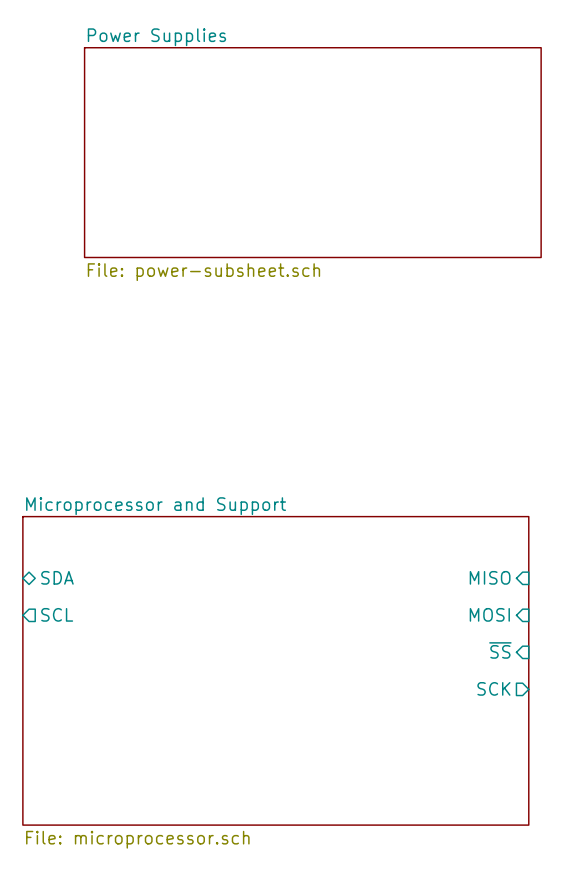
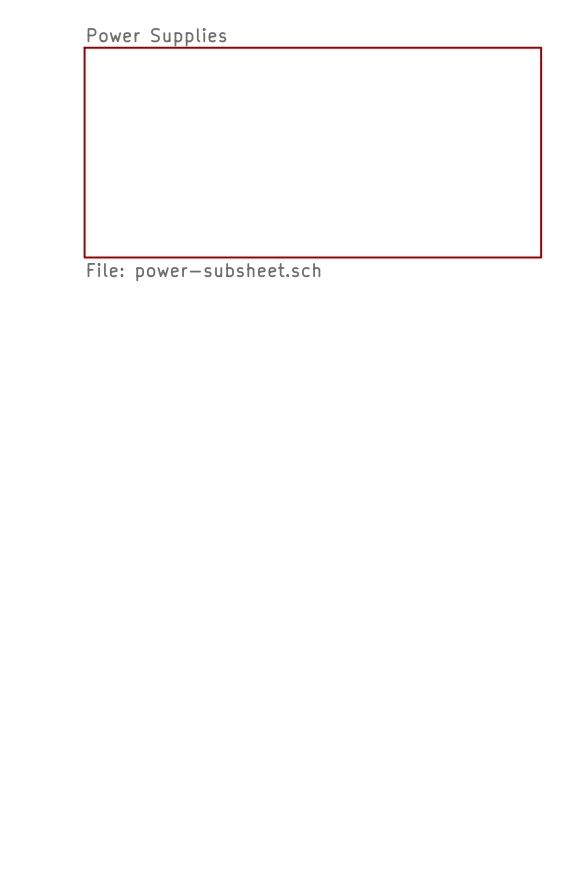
sheet pin: SDA (57, 577) -> none
sheet pin: MISO (490, 577) -> none
sheet pin: SCL (57, 614) -> none
sheet pin: MOSI (489, 614) -> none
sheet pin: ~{SS} (500, 650) -> none
sheet Microprocessor and Support: File: microprocessor.sch (275, 670) -> none
sheet pin: SCK (493, 688) -> none

